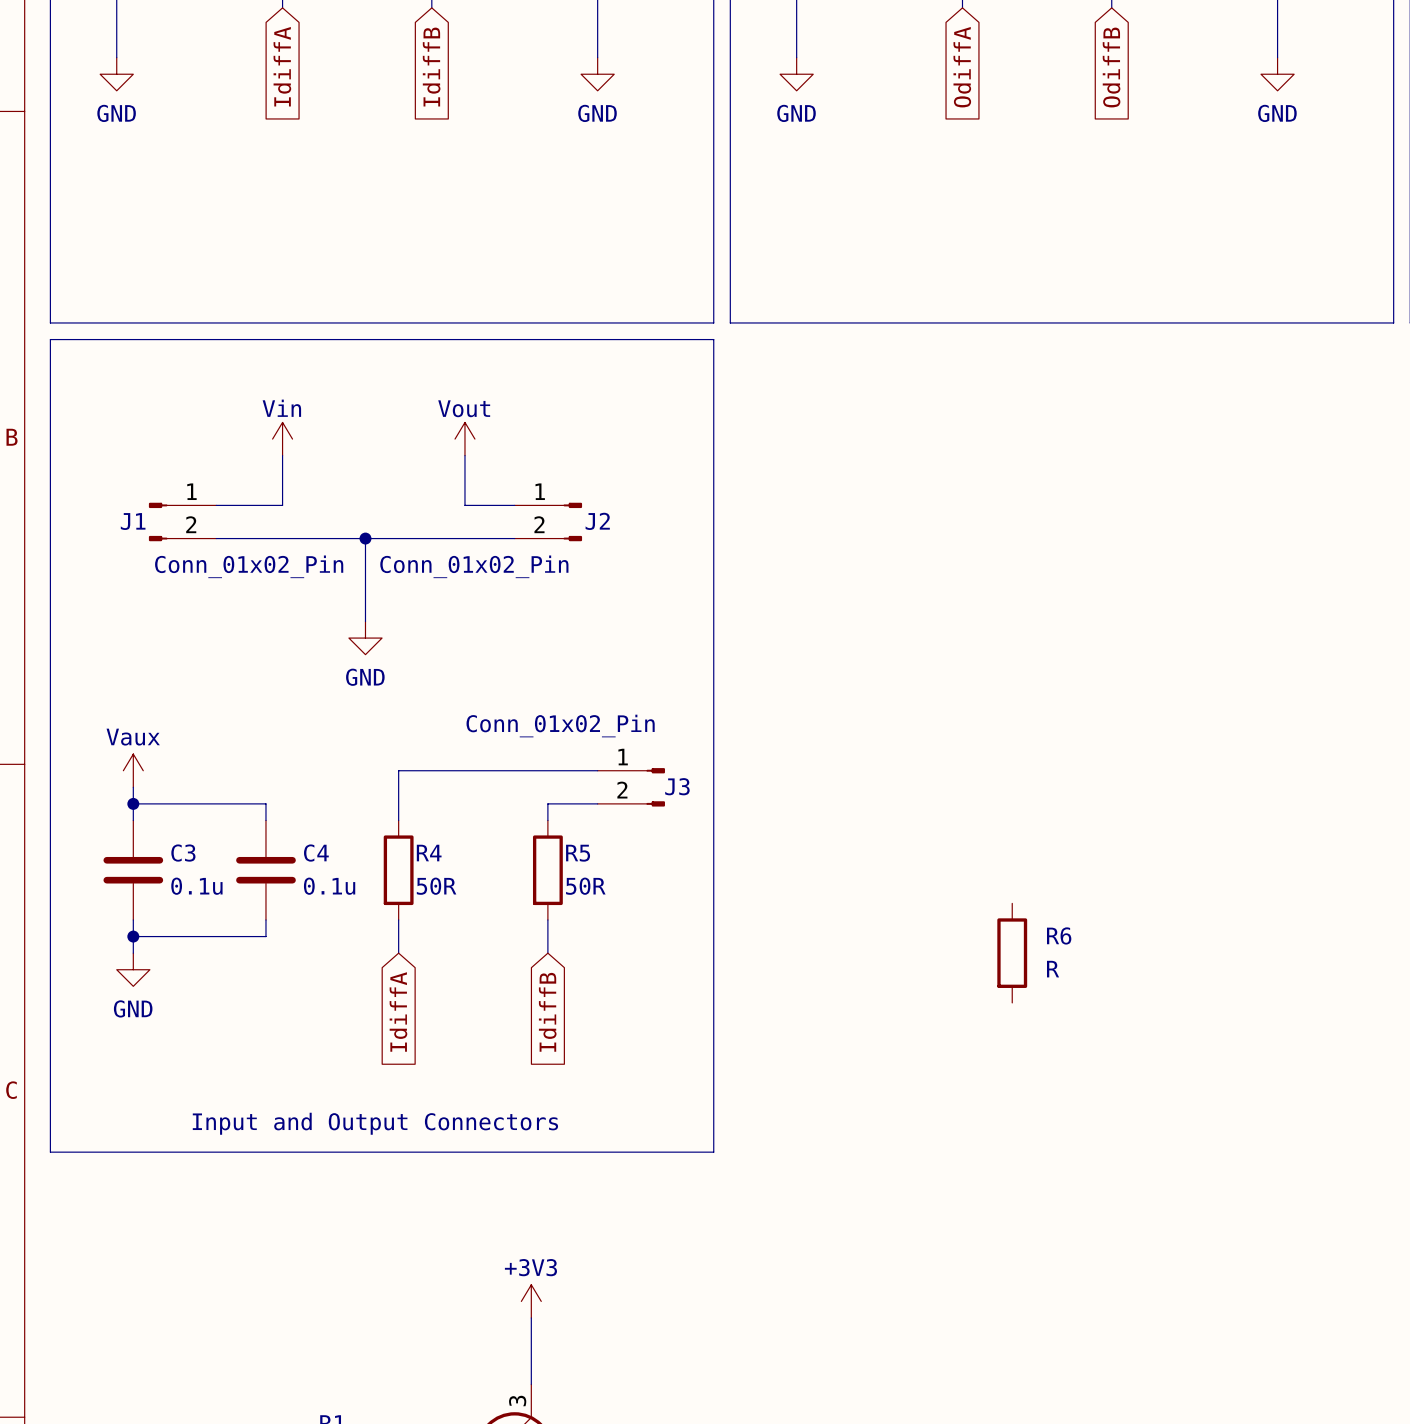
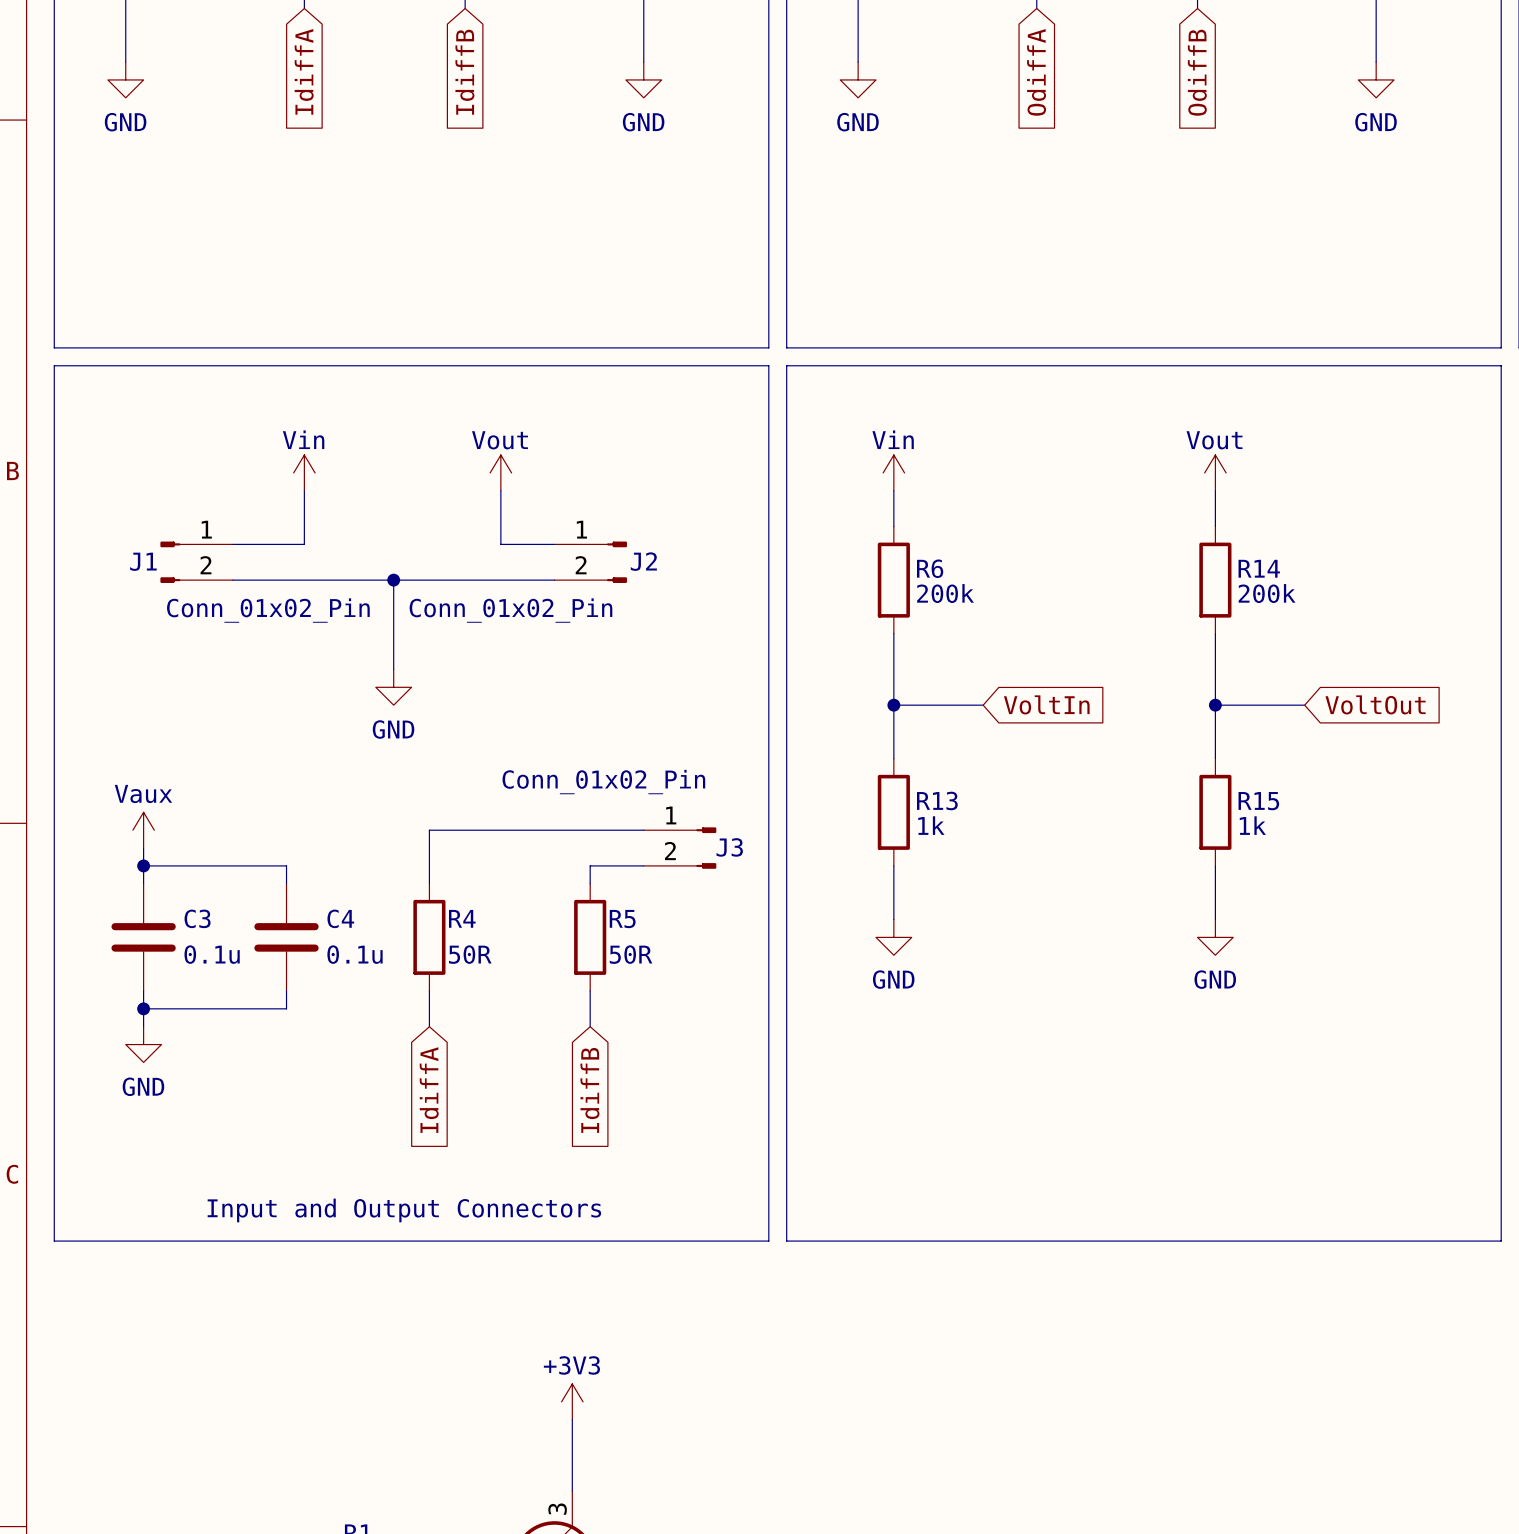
line: none -> (786, 365) (1501, 365) (1501, 1241) (786, 1241) (786, 365)
power symbol: none -> Vin (893, 472)
power symbol: none -> Vout (1215, 472)
wire: none -> (893, 490) (893, 526)
wire: none -> (1215, 490) (1215, 526)
R14: none -> 200k (1215, 580)
wire: none -> (893, 633) (893, 758)
wire: none -> (1215, 633) (1215, 758)
wire: none -> (893, 705) (983, 705)
junction: none -> (893, 705)
global label: none -> VoltIn (1046, 704)
wire: none -> (1215, 705) (1304, 705)
junction: none -> (1215, 705)
global label: none -> VoltOut (1375, 704)
R13: none -> 1k (893, 812)
R15: none -> 1k (1215, 812)
wire: none -> (893, 865) (893, 919)
wire: none -> (1215, 865) (1215, 919)
power symbol: none -> GND (893, 937)
power symbol: none -> GND (1215, 937)
R6 name position: R6 (1059, 935) -> R6 (930, 568)
R6 position: (1012, 953) -> (893, 580)
R6 value: R (1053, 969) -> 200k (945, 593)

